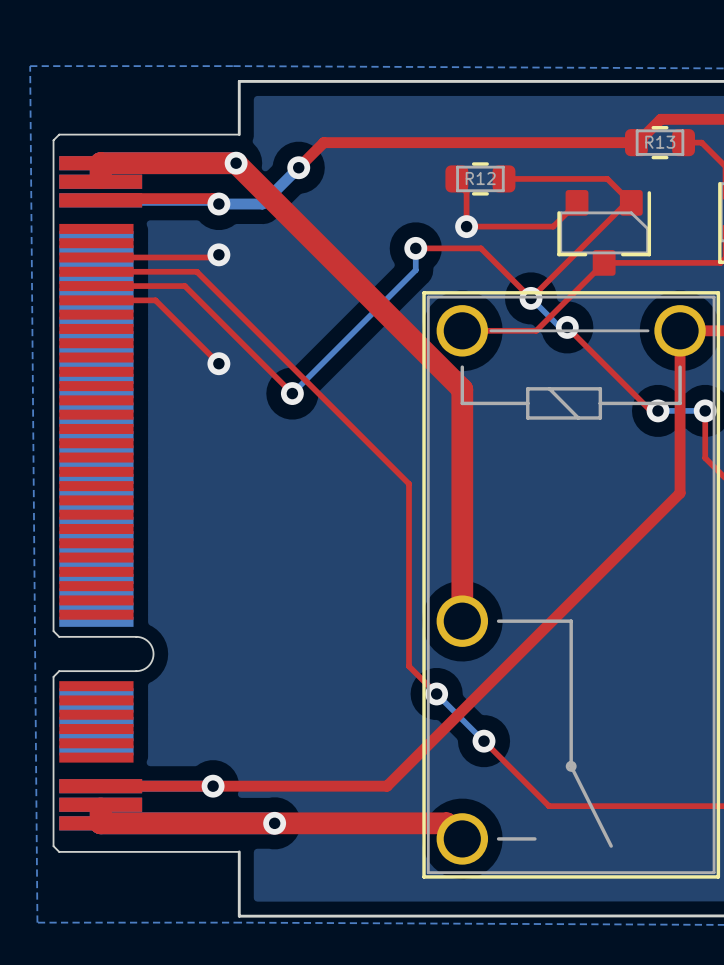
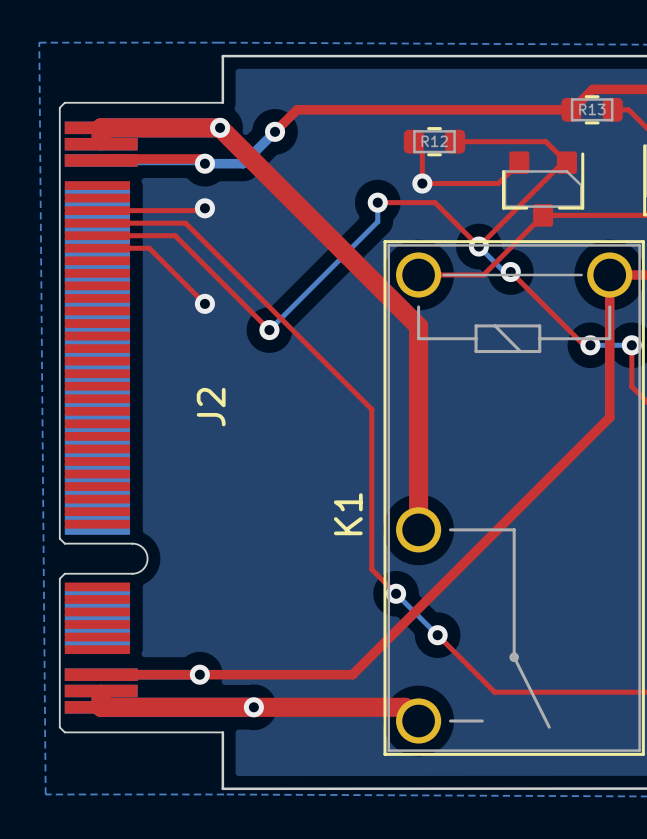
J2 name: none -> J2 (211, 407)
K1 name: none -> K1 (348, 514)

